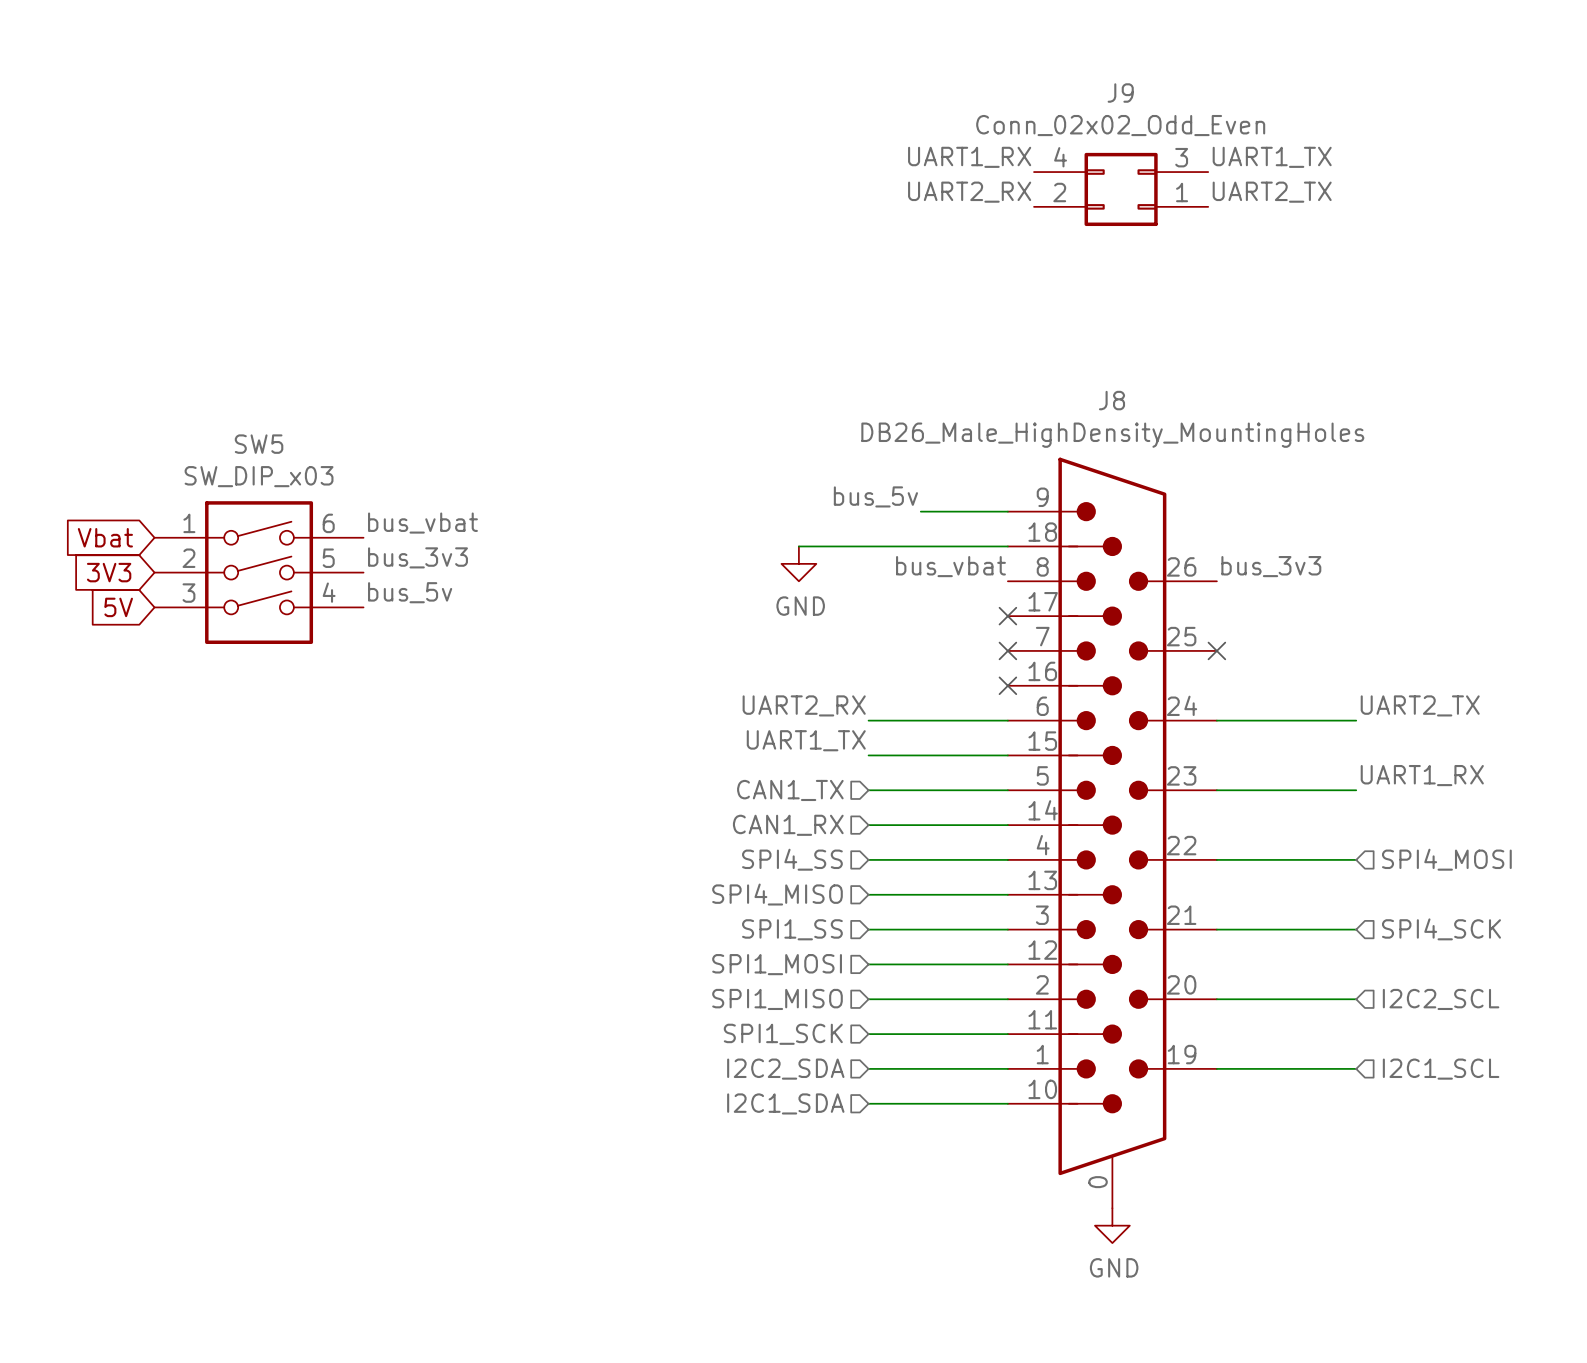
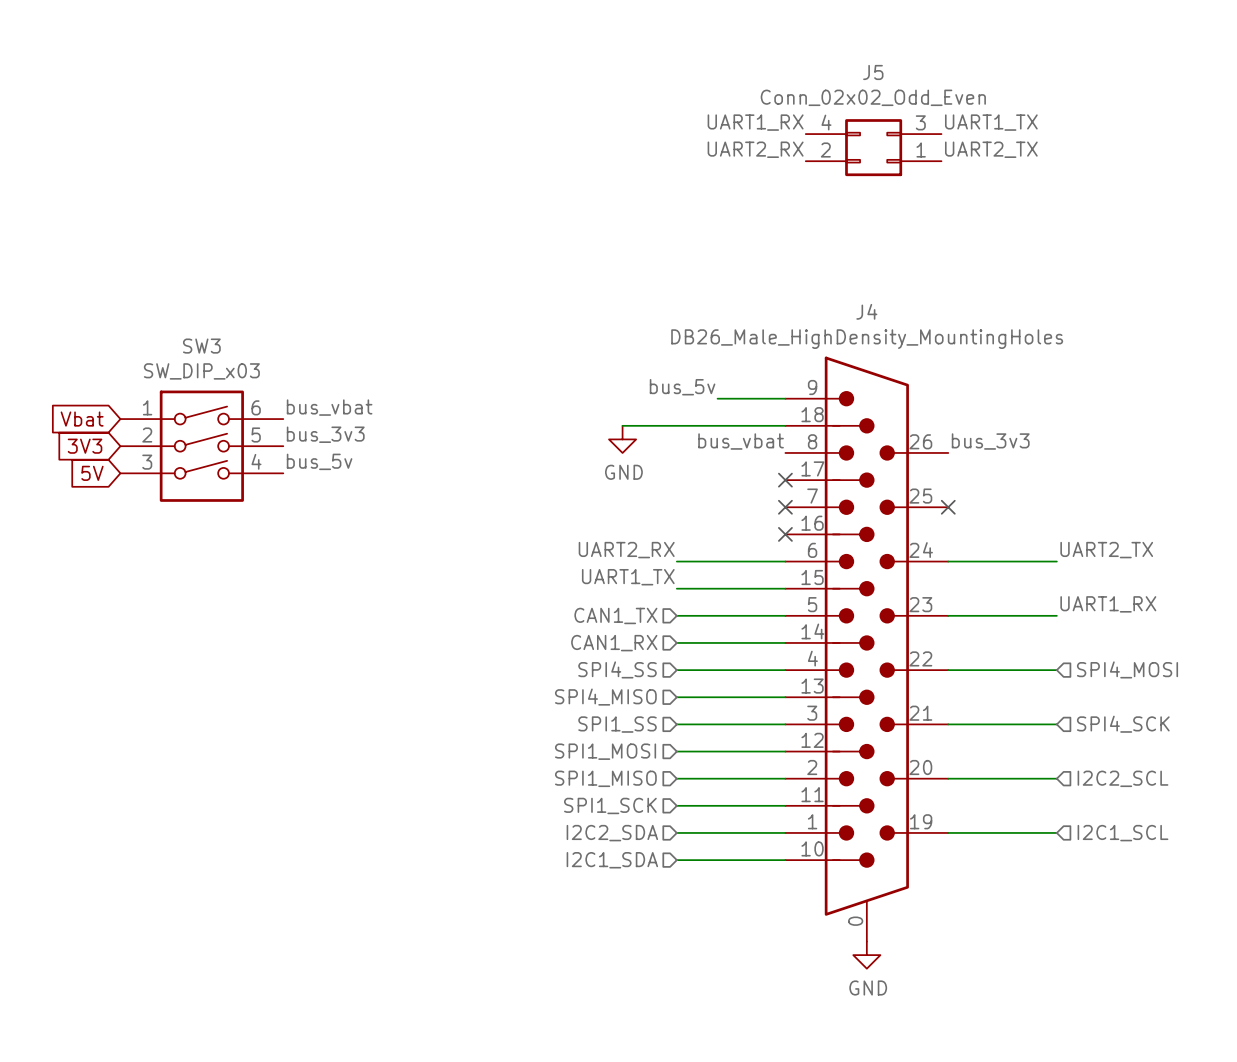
J9 name: J9 (1120, 93) -> J5 (873, 72)
J8 name: J8 (1111, 400) -> J4 (866, 311)
SW5 name: SW5 (259, 444) -> SW3 (201, 346)

